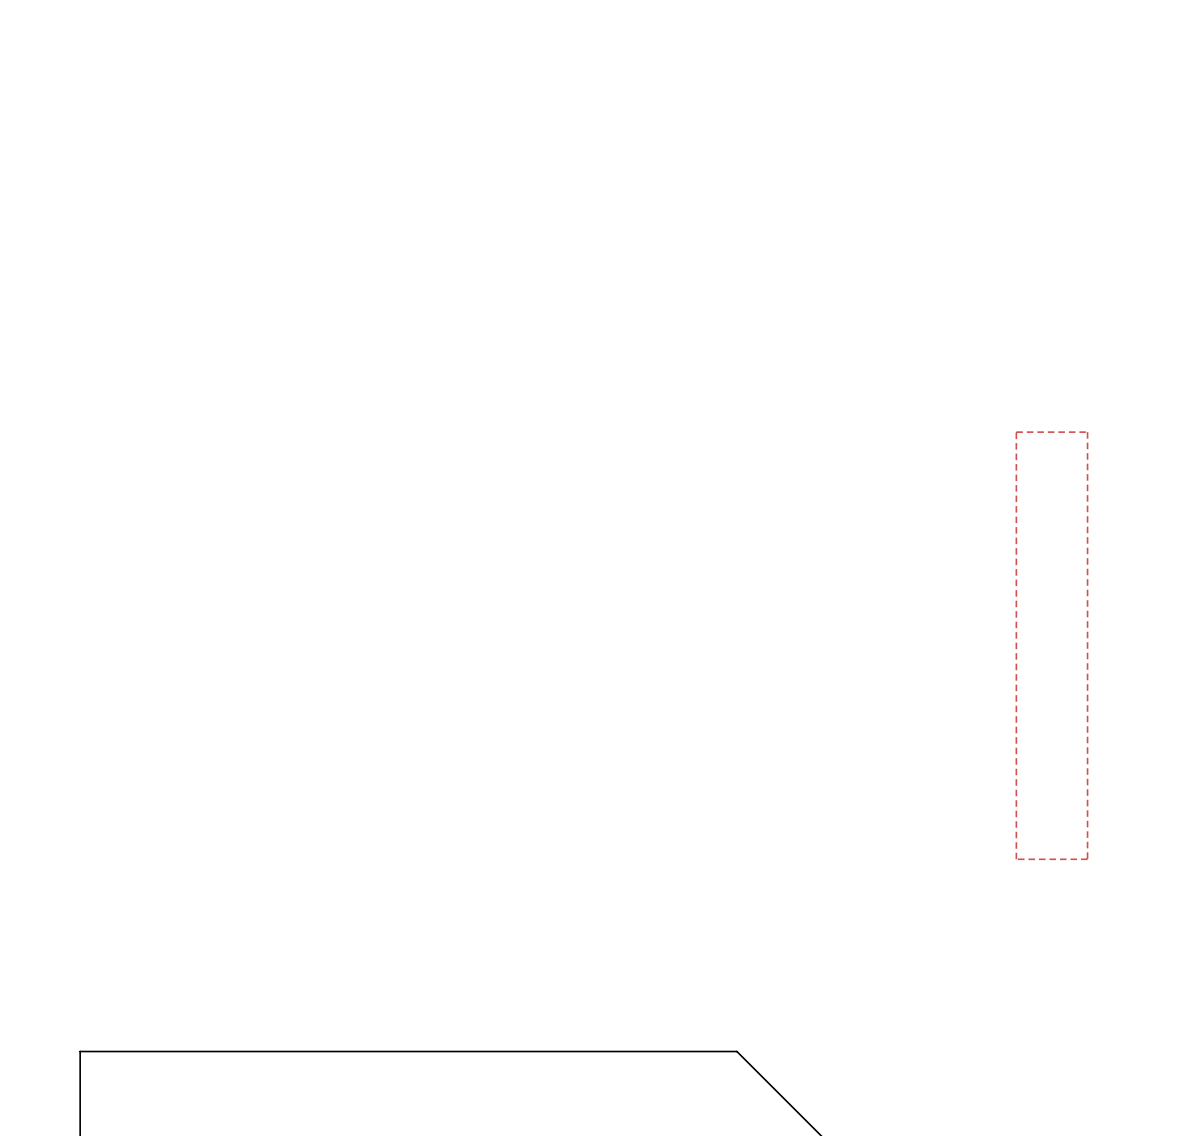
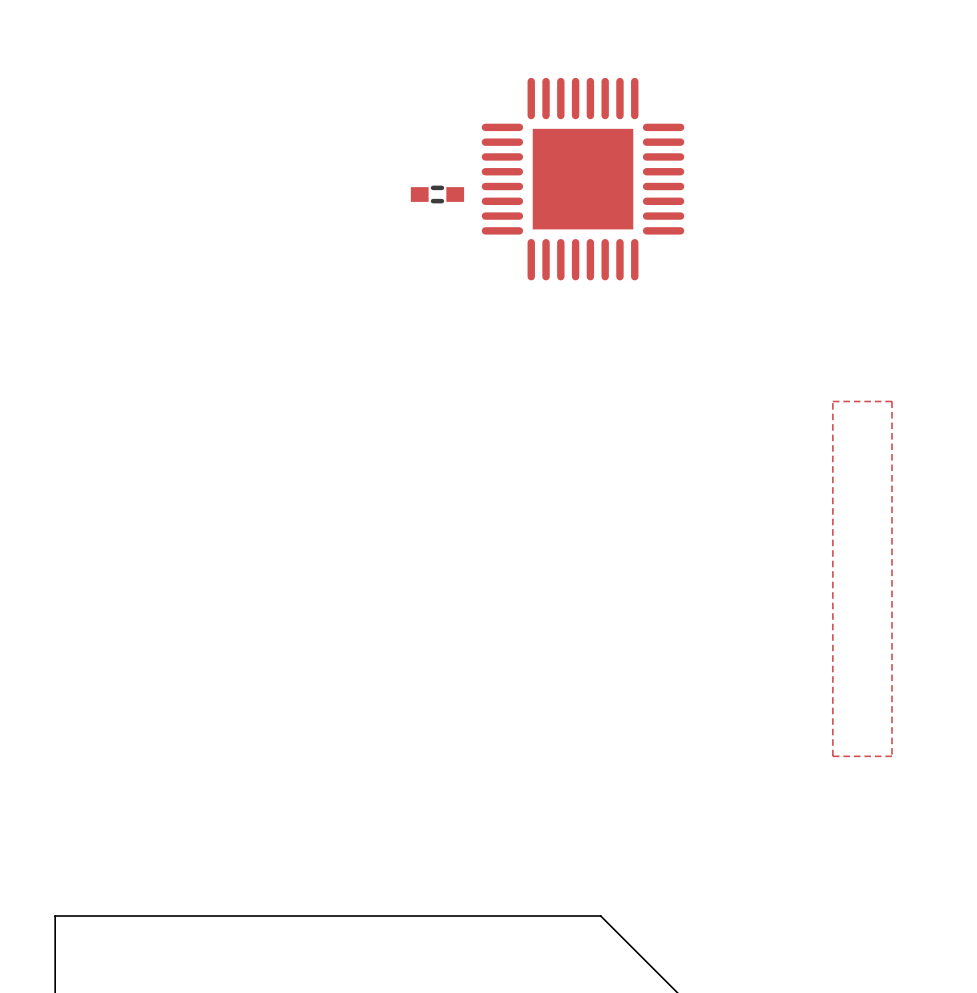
part: none -> (582, 179)
part: none -> (437, 194)

